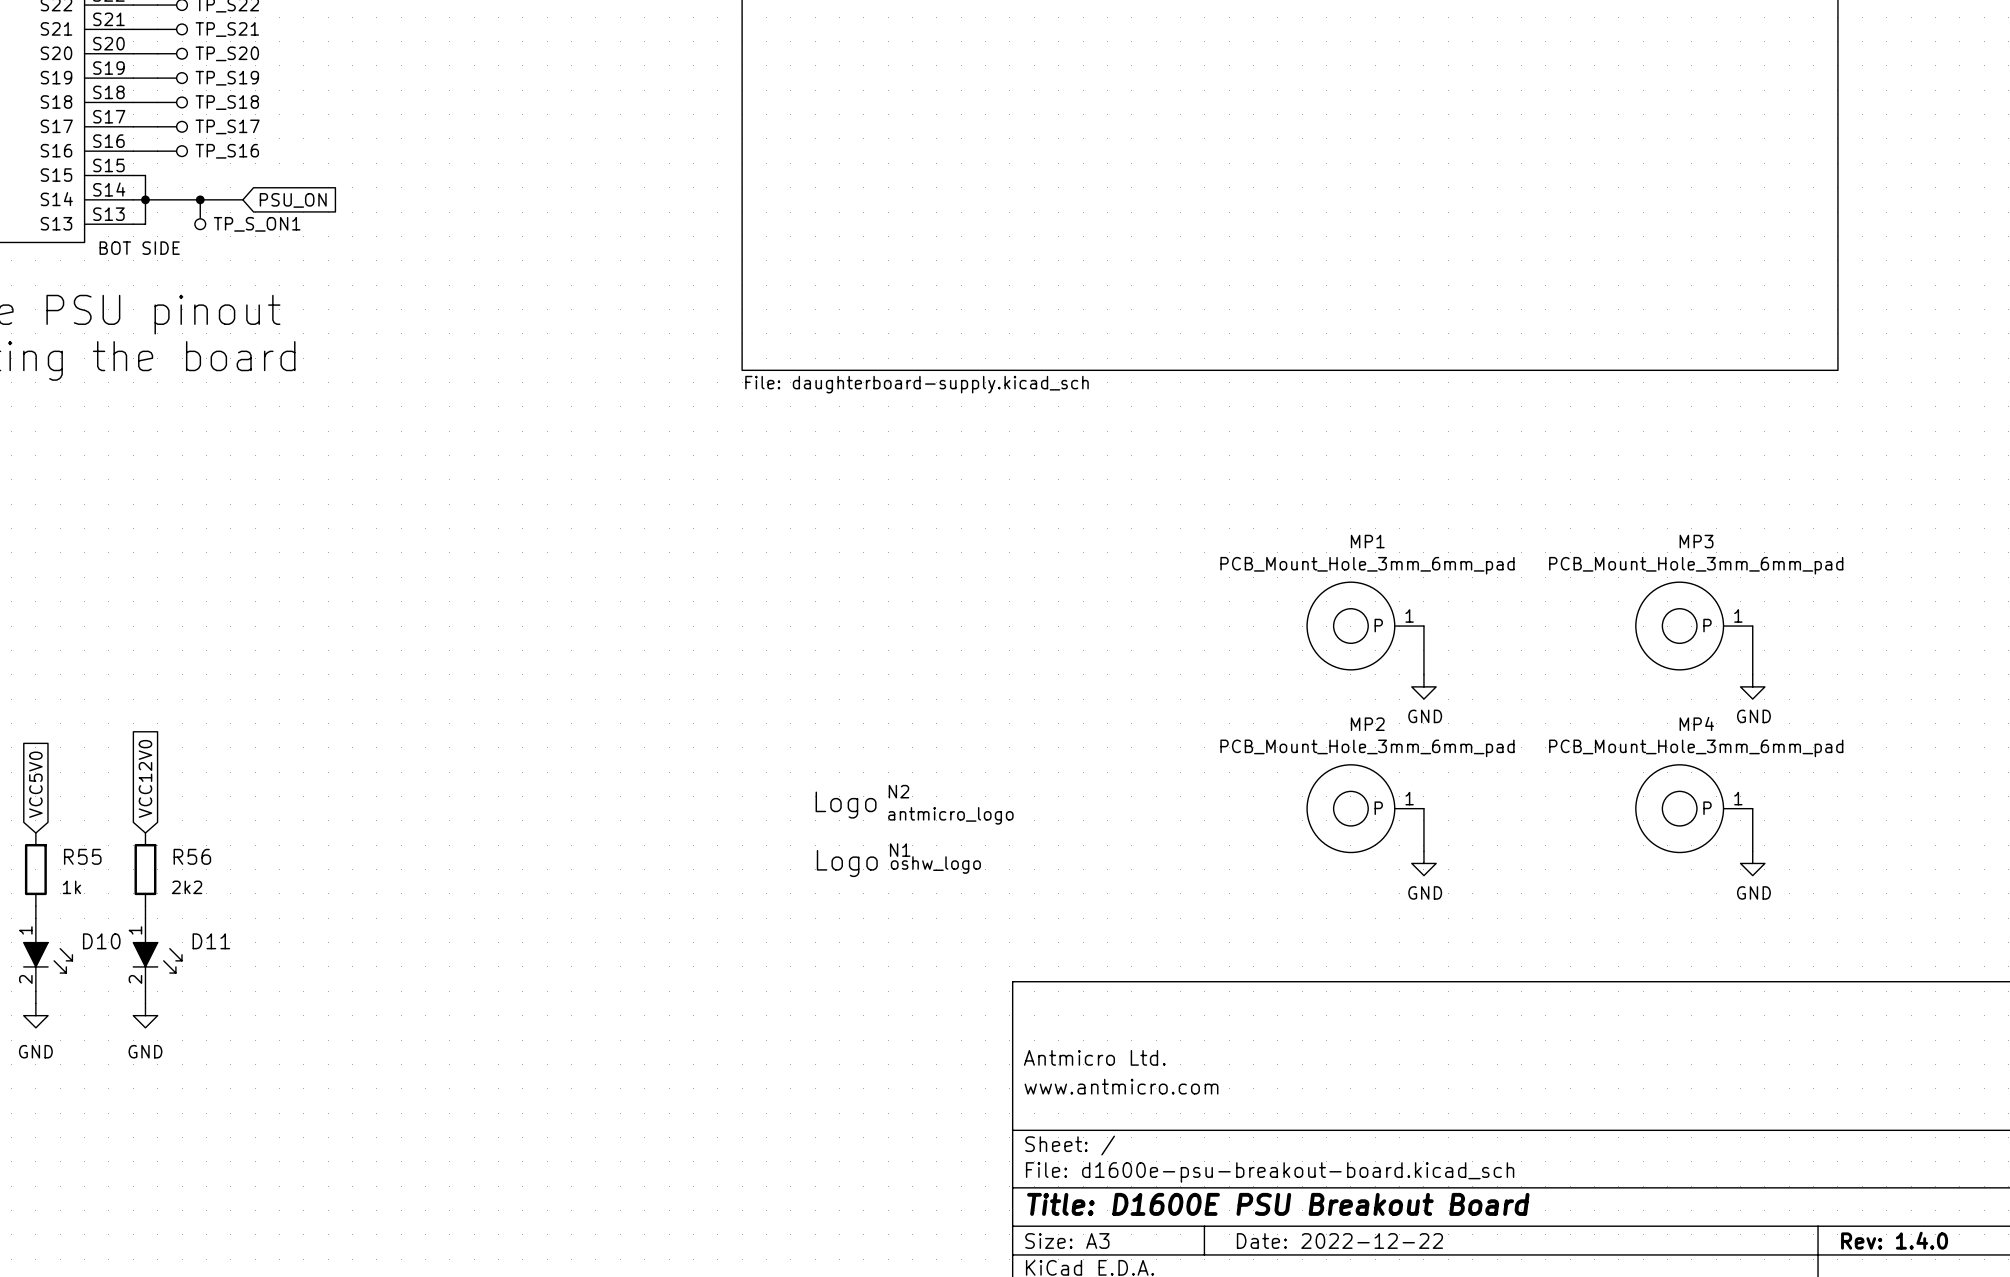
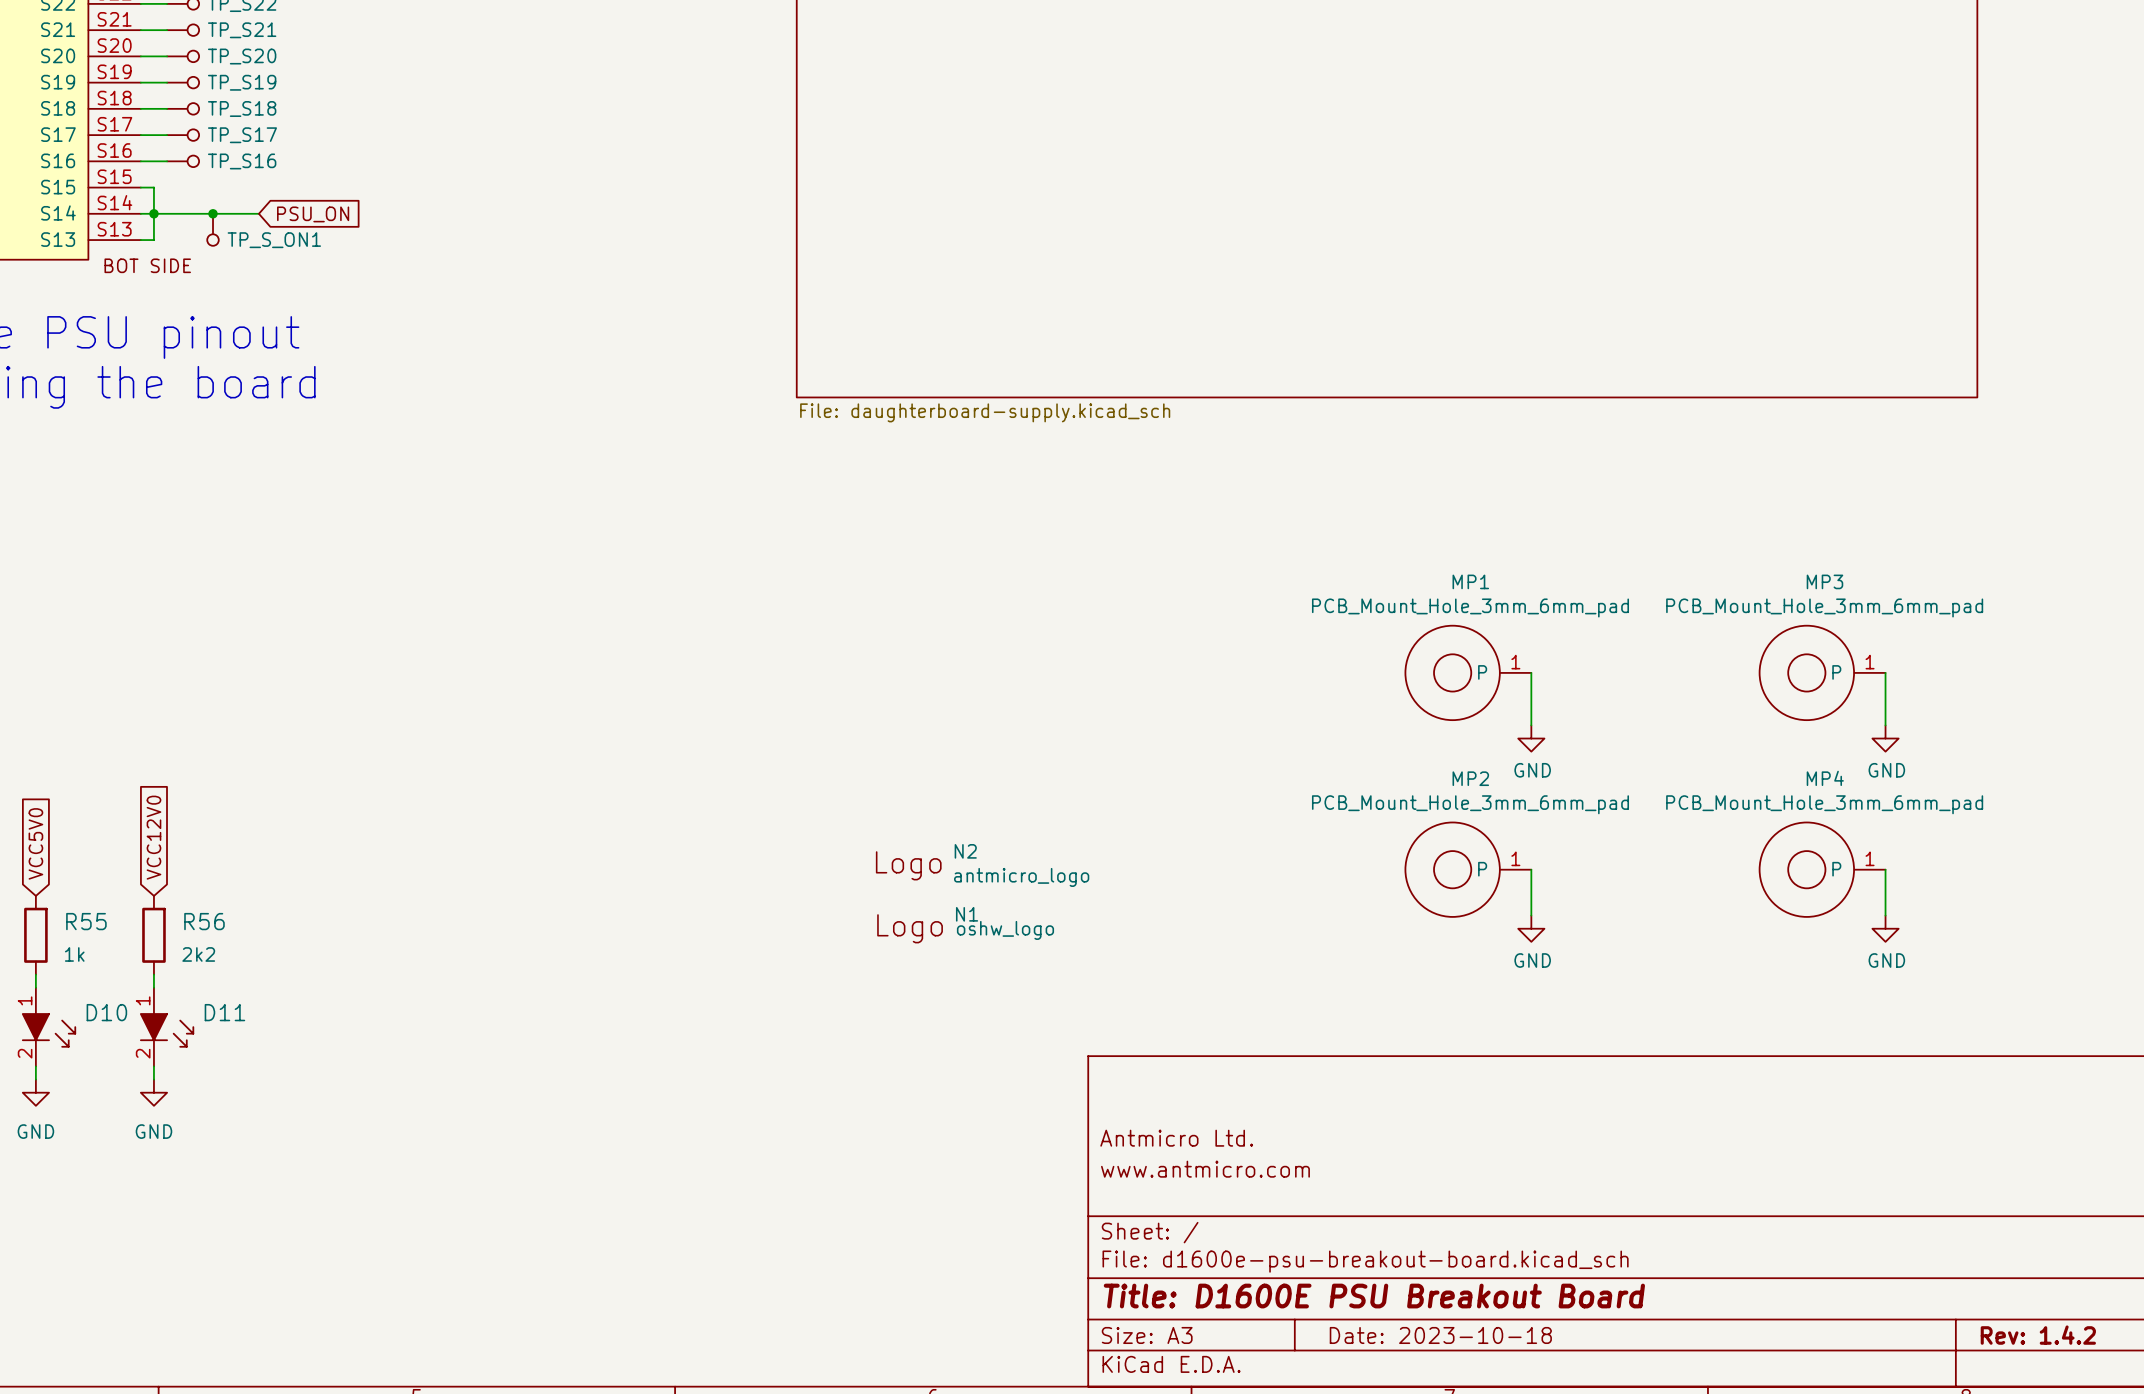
title block: Rev: 1.4.0 (1894, 1240) -> Rev: 1.4.2 (2038, 1335)
title block: Date: 2022-12-22 (1339, 1241) -> Date: 2023-10-18 (1440, 1335)

